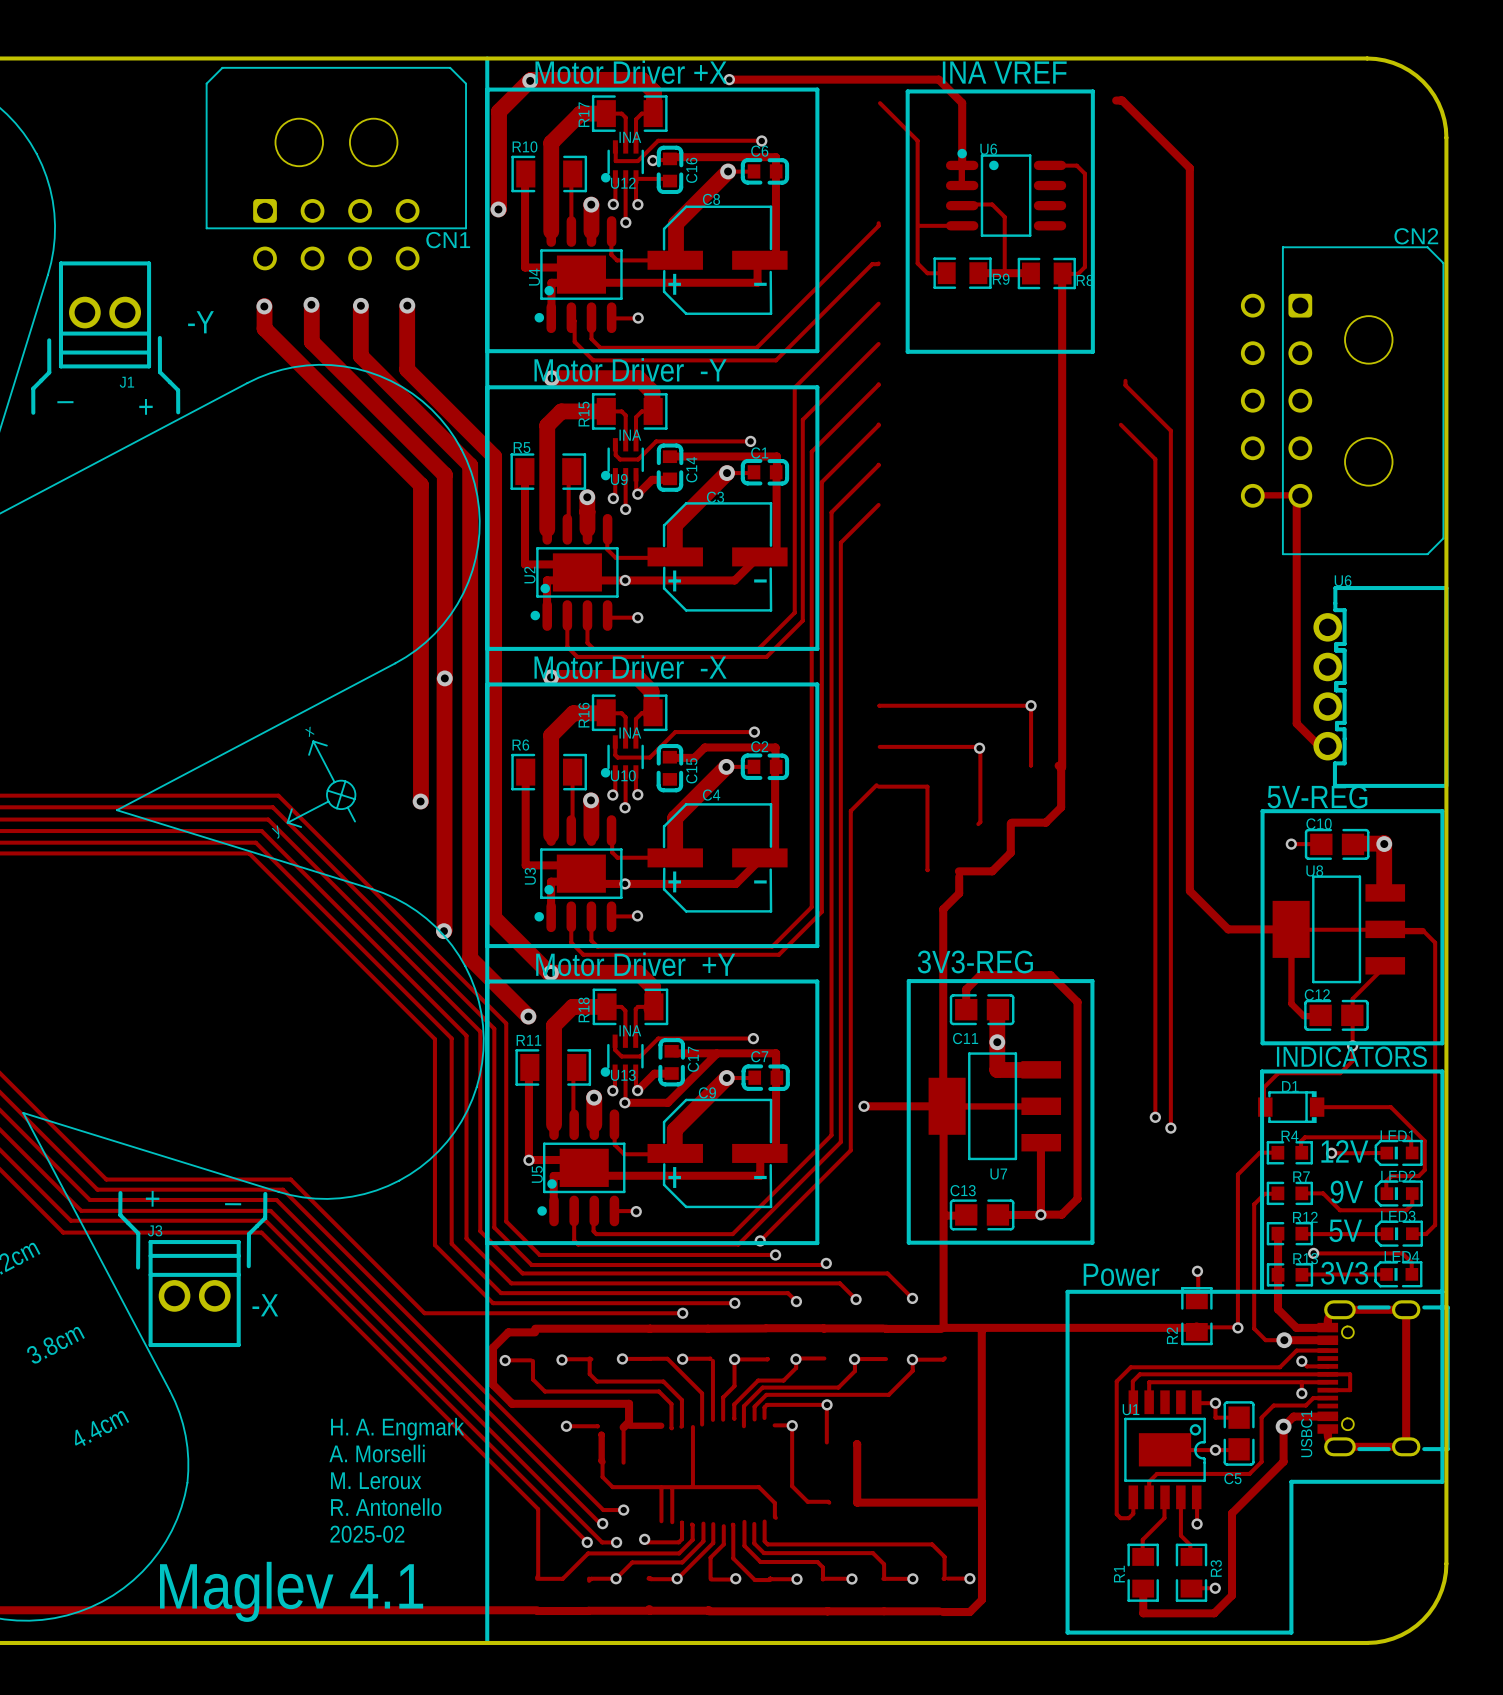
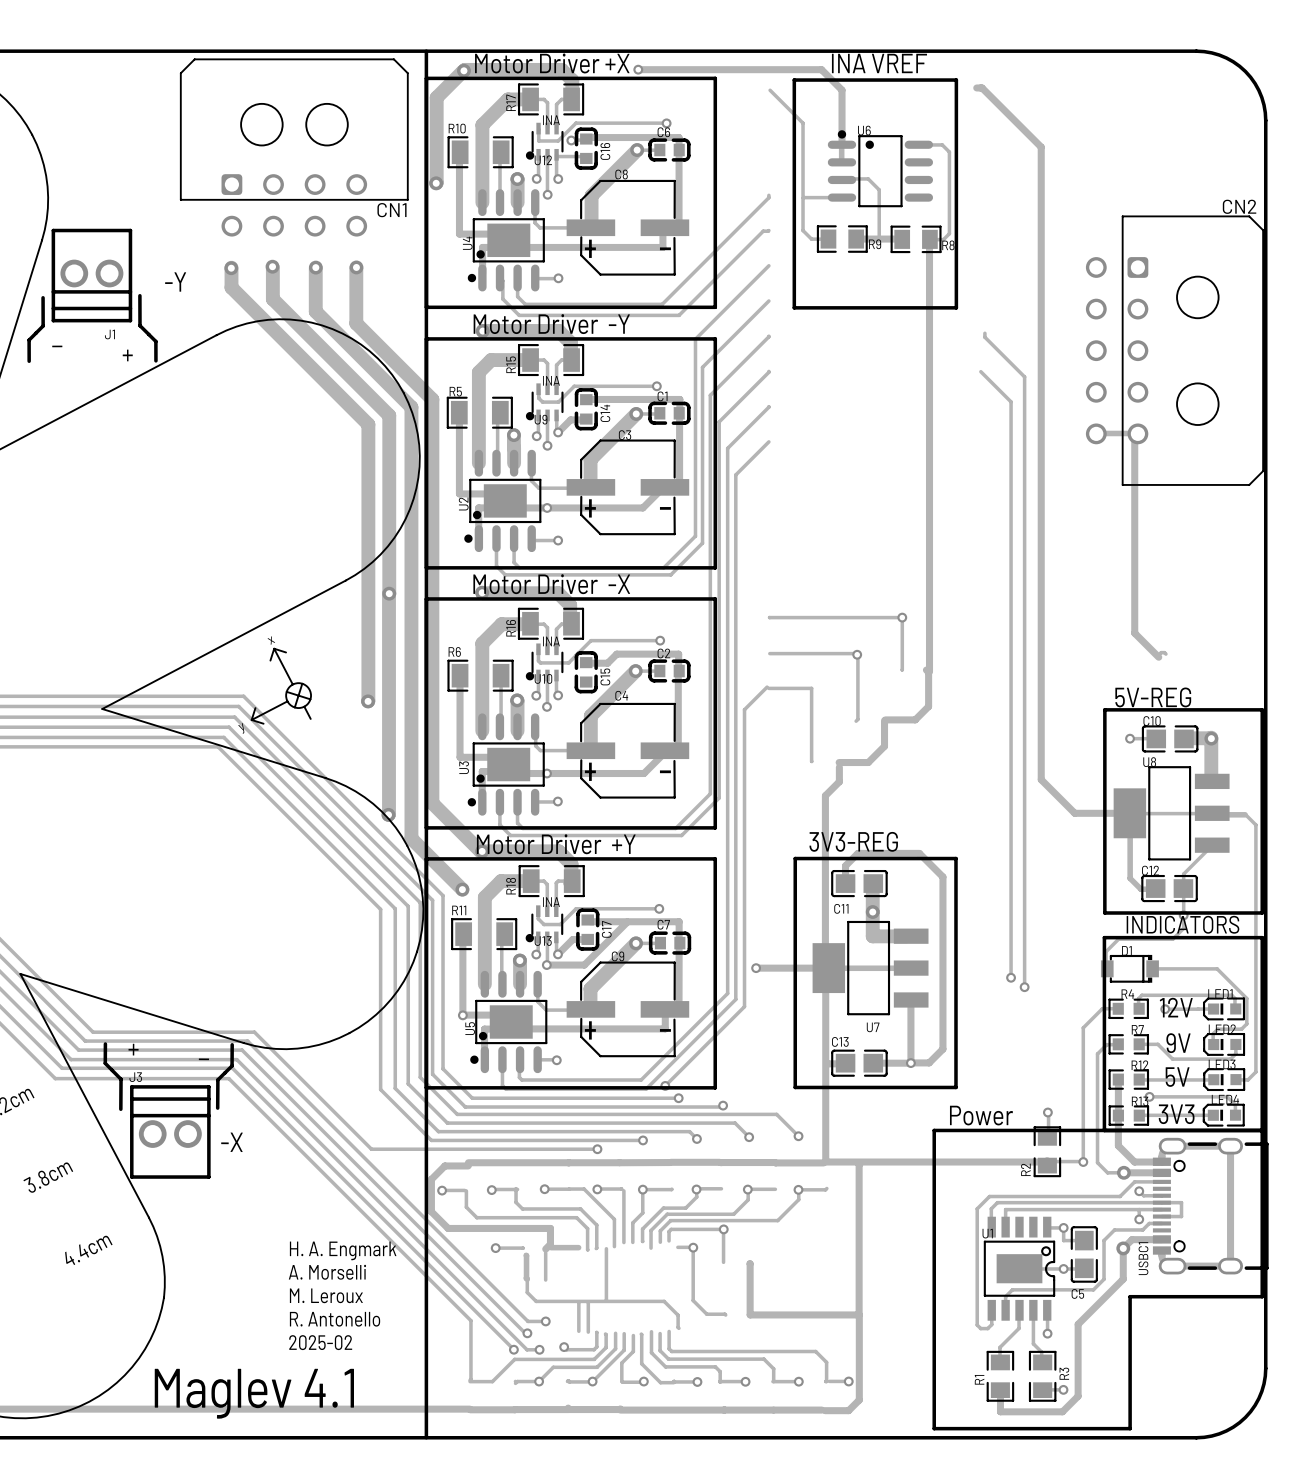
U6: (1380, 686) -> none

